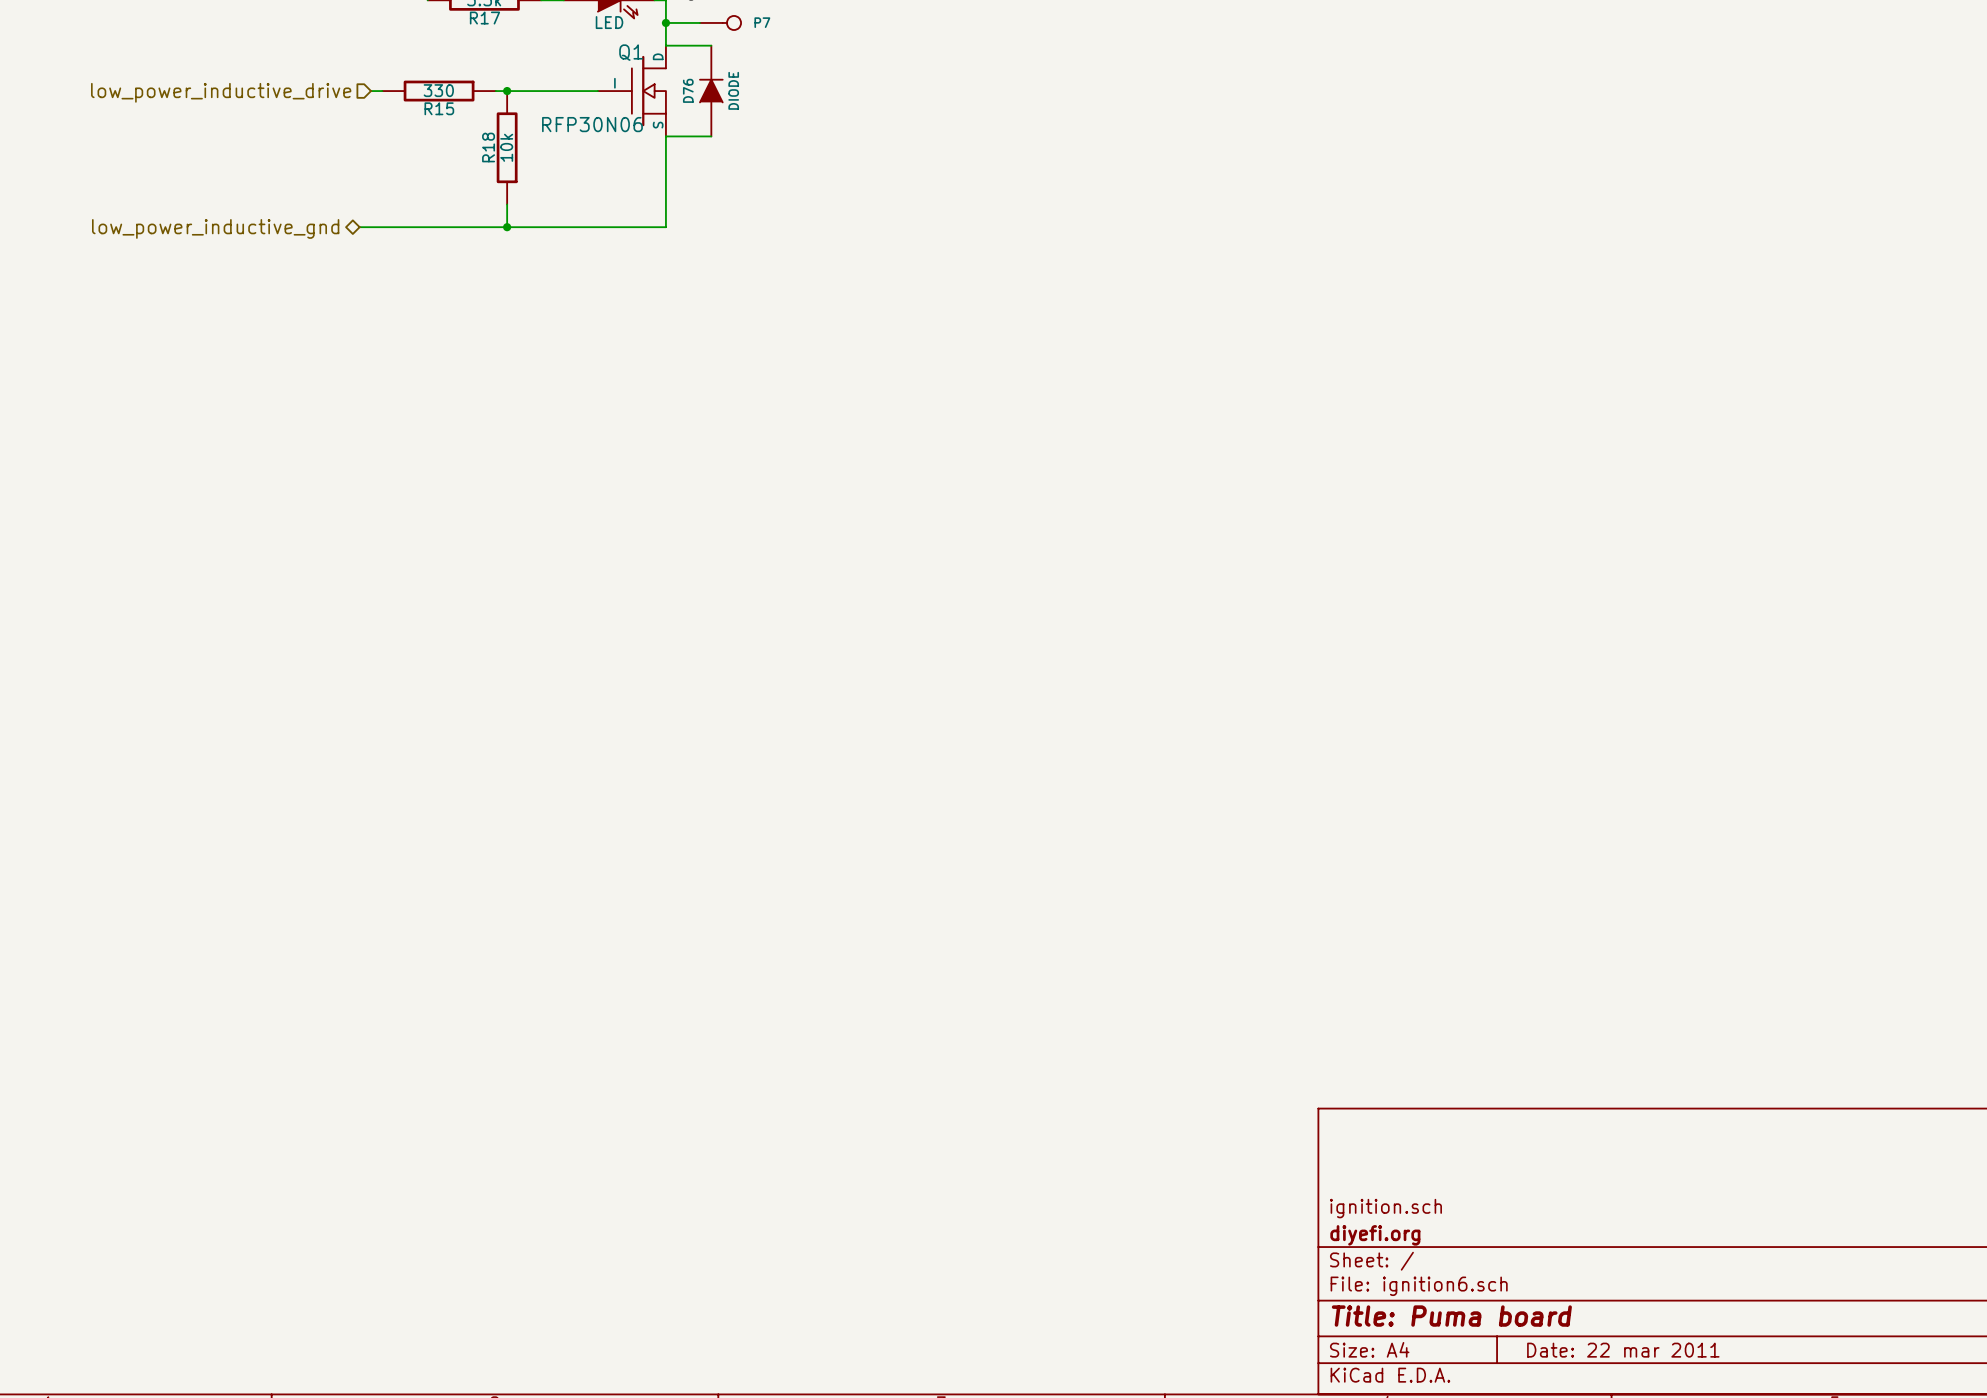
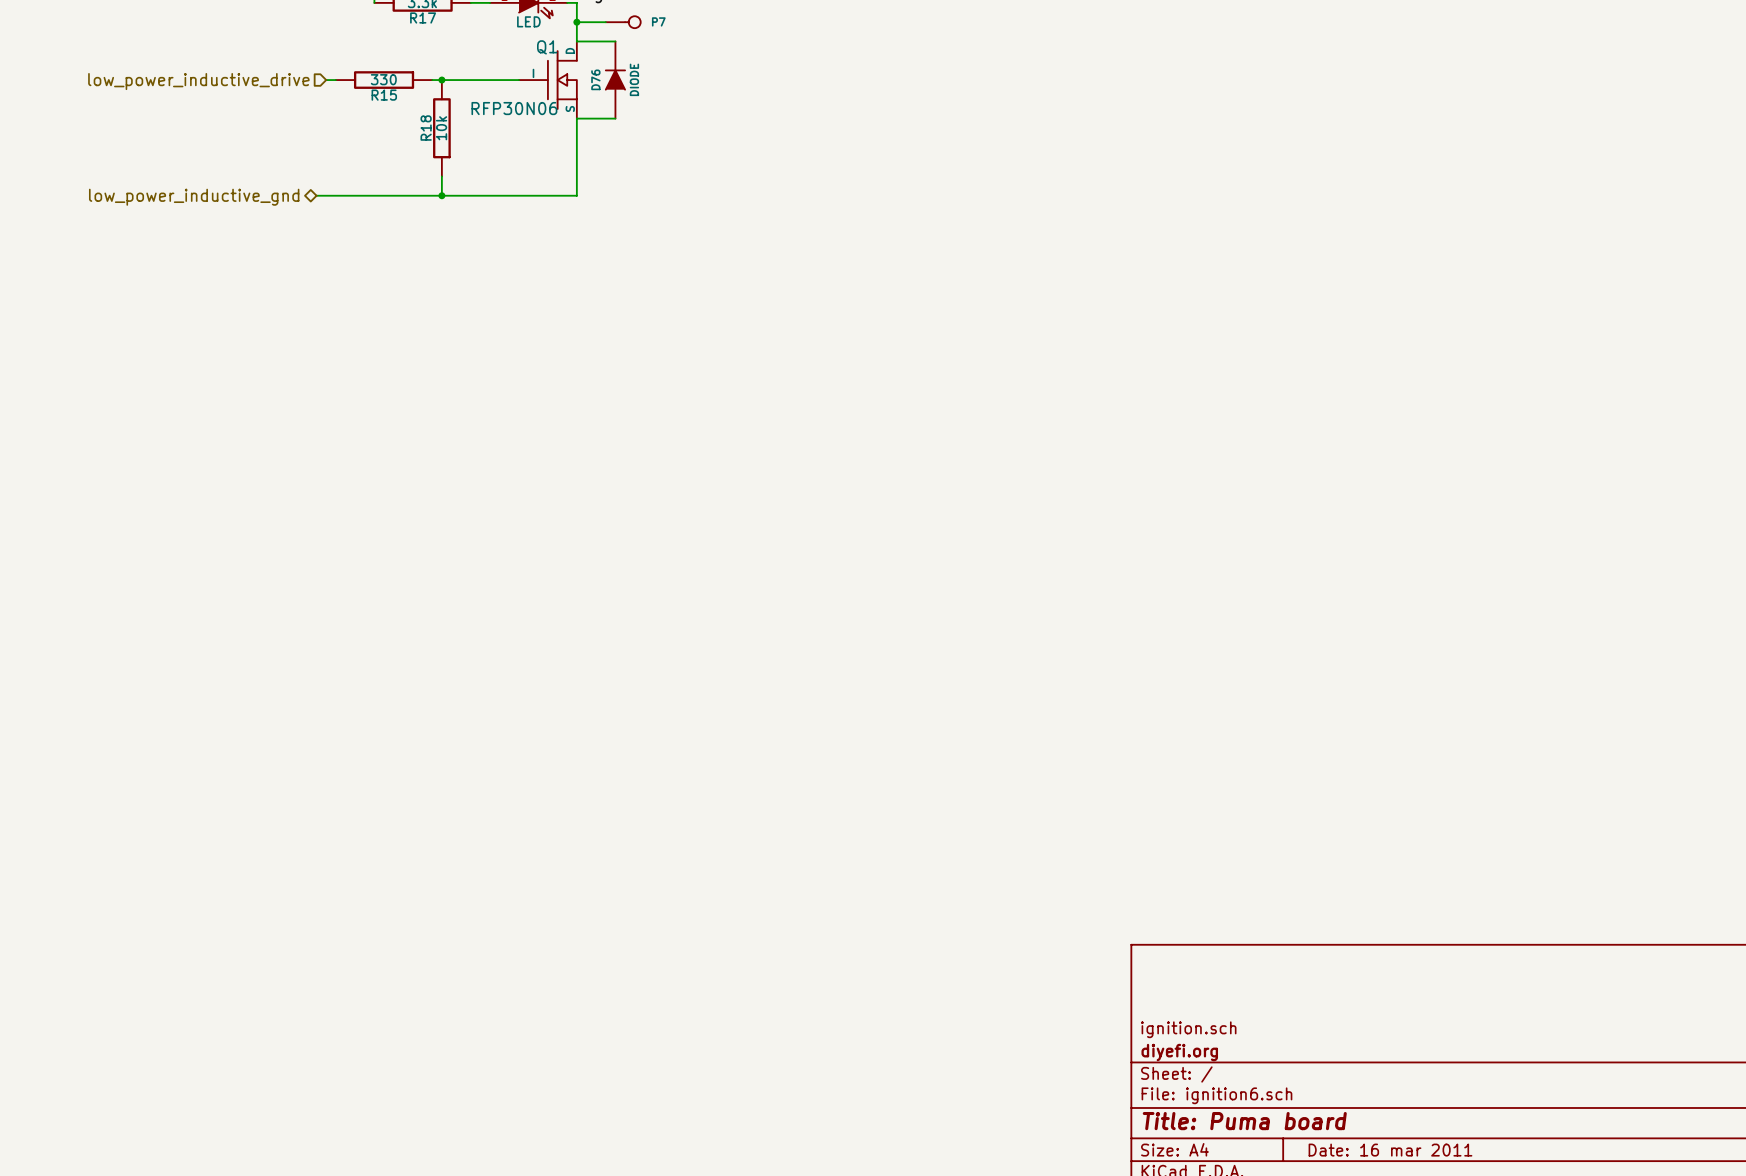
title block: Date: 22 mar 2011 (1623, 1350) -> Date: 16 mar 2011 (1390, 1150)

